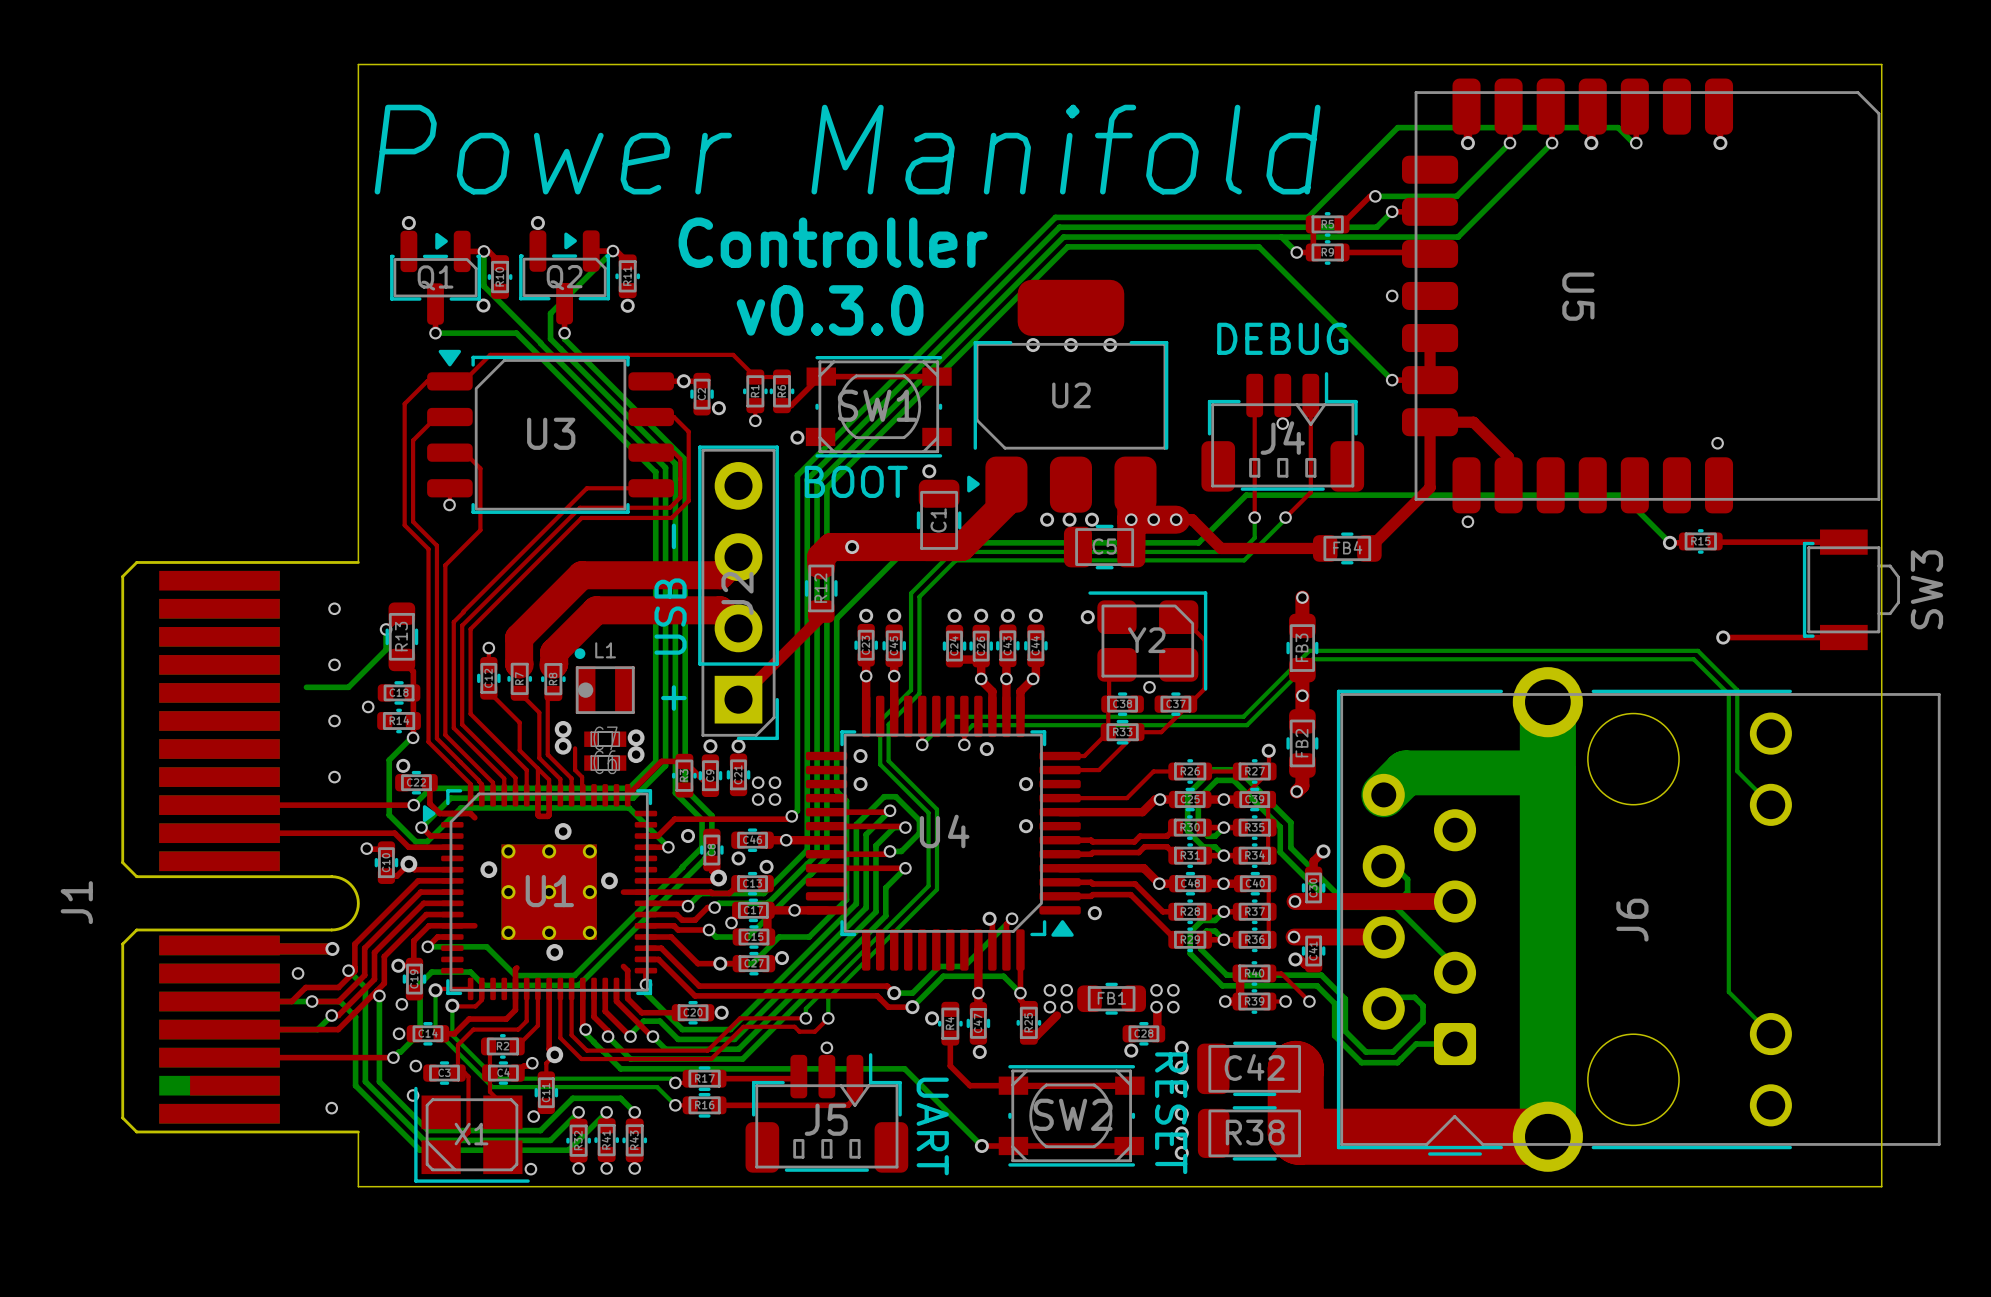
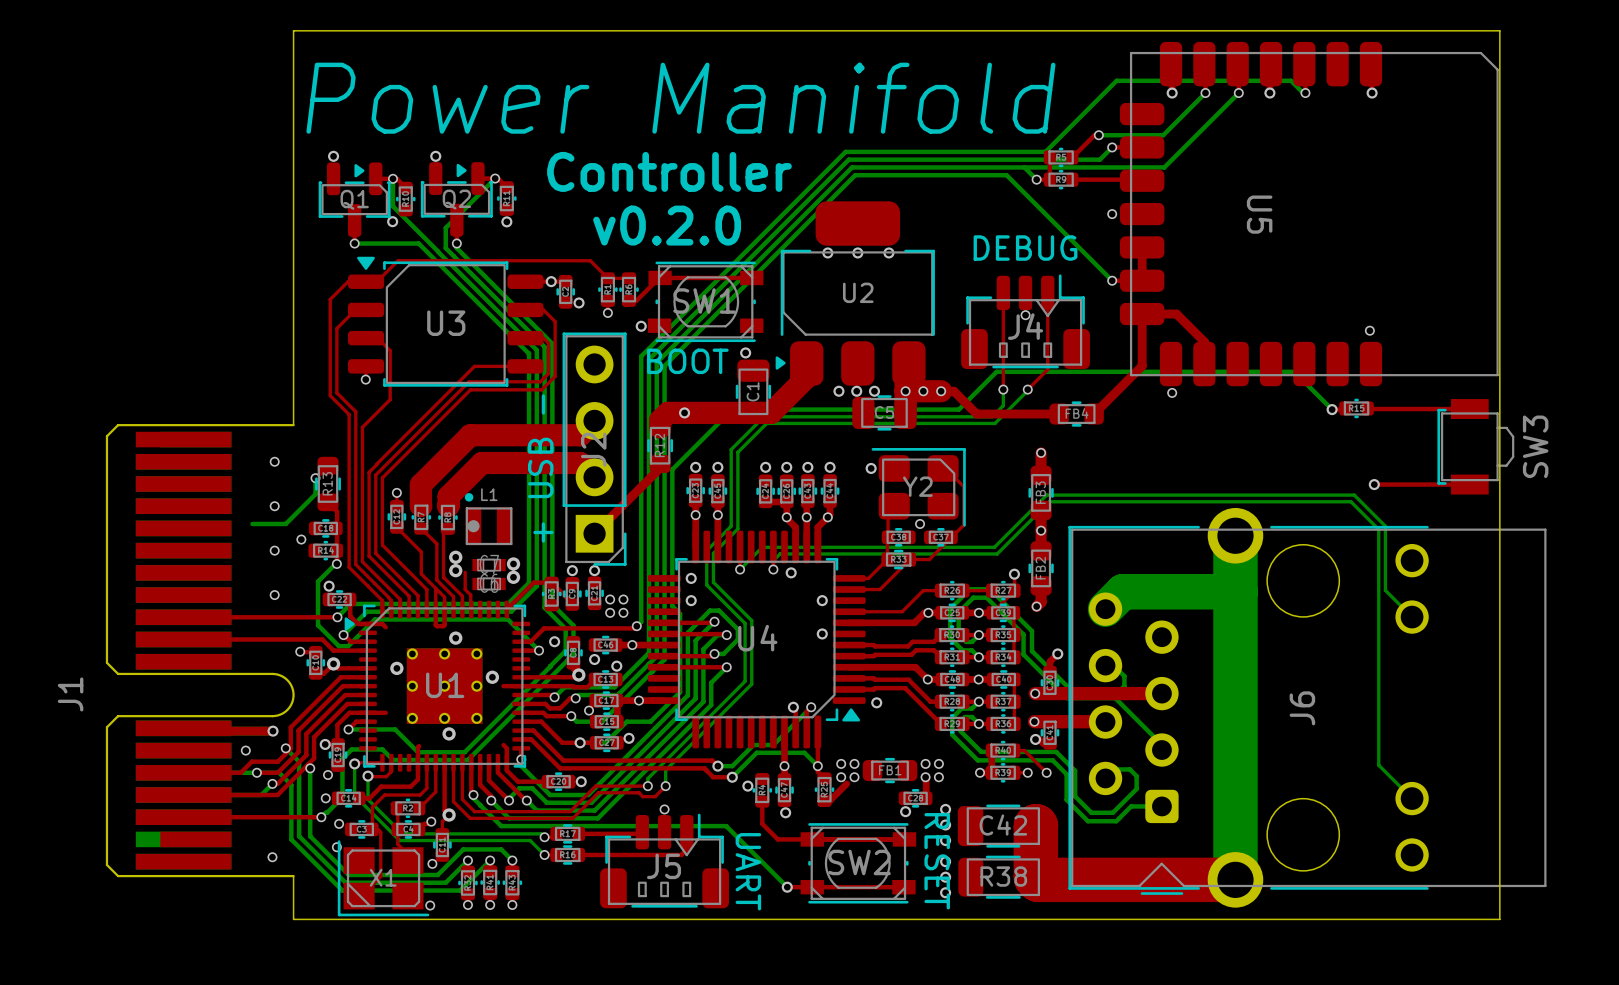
text: v0.3.0 (830, 310) -> v0.2.0 (667, 225)

